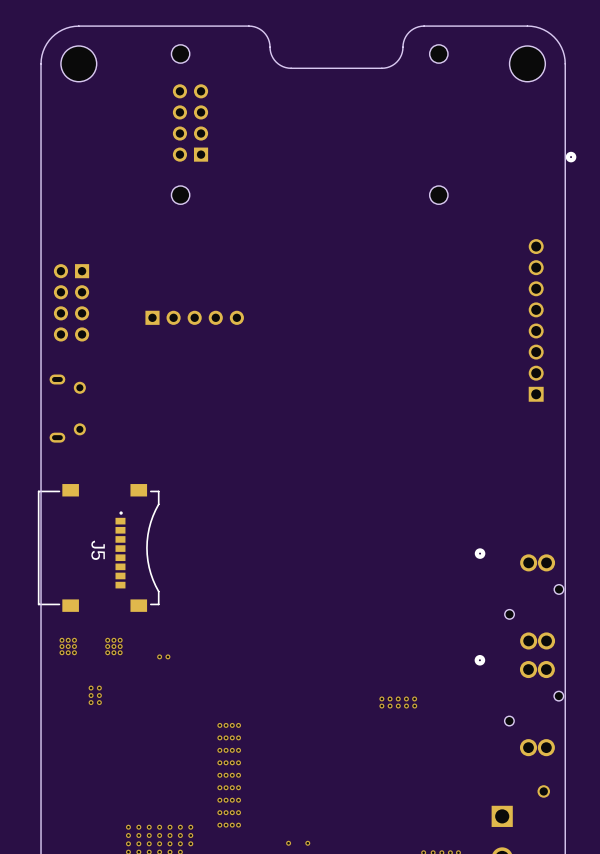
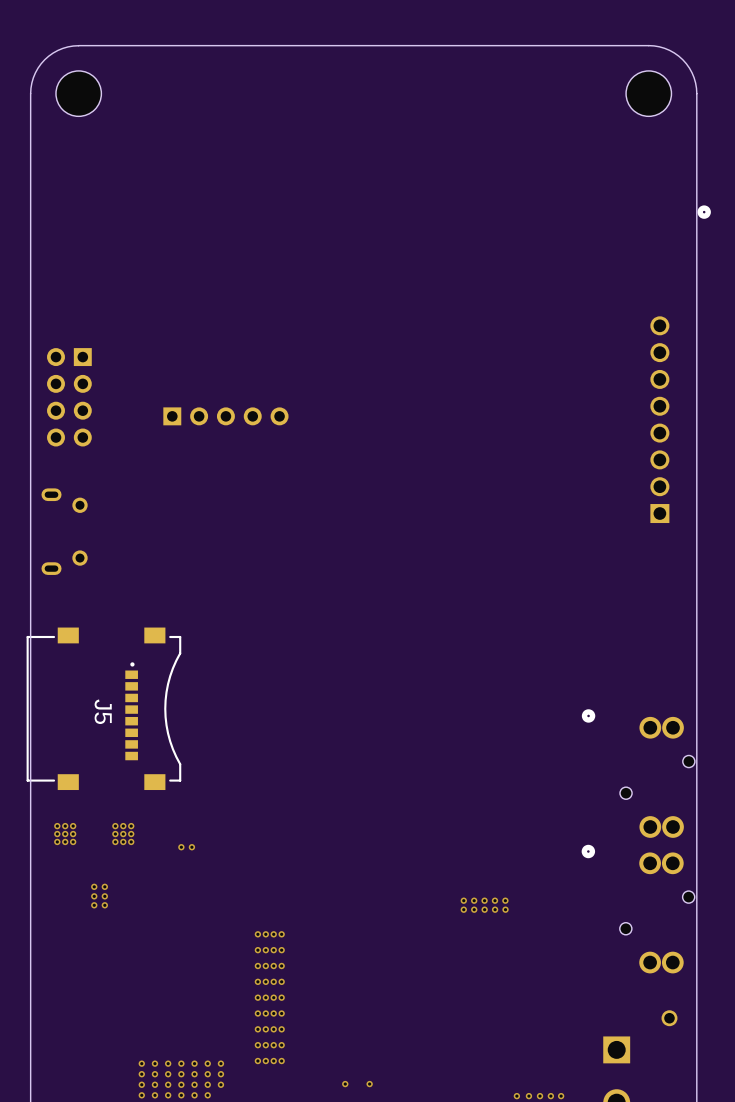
board edge: (424, 26) (416, 27) (407, 34) (401, 55) (396, 62) (389, 66) (381, 68) (285, 67) (278, 63) (272, 57) (268, 39) (263, 32) (257, 27) (248, 26) -> (517, 45) (294, 45)
part: (180, 53) -> none
part: (438, 53) -> none
part: (190, 122) -> none
part: (180, 195) -> none
part: (438, 195) -> none

